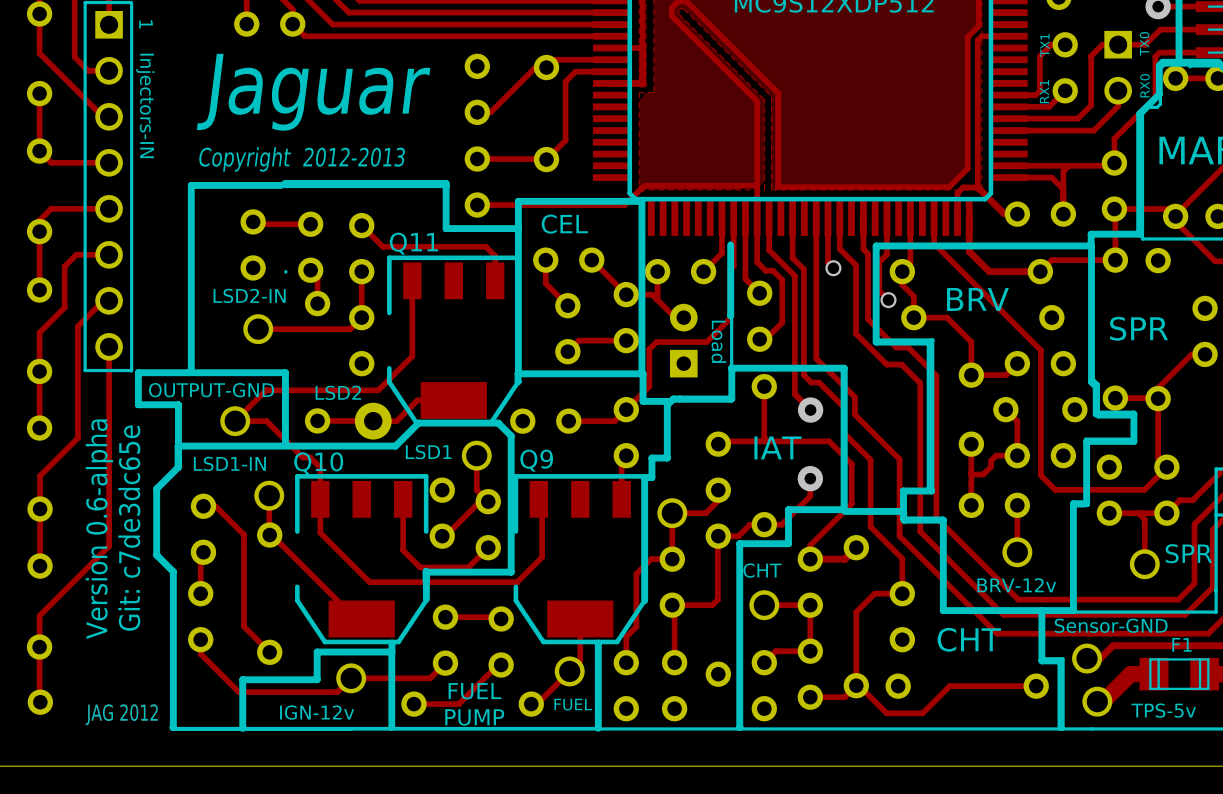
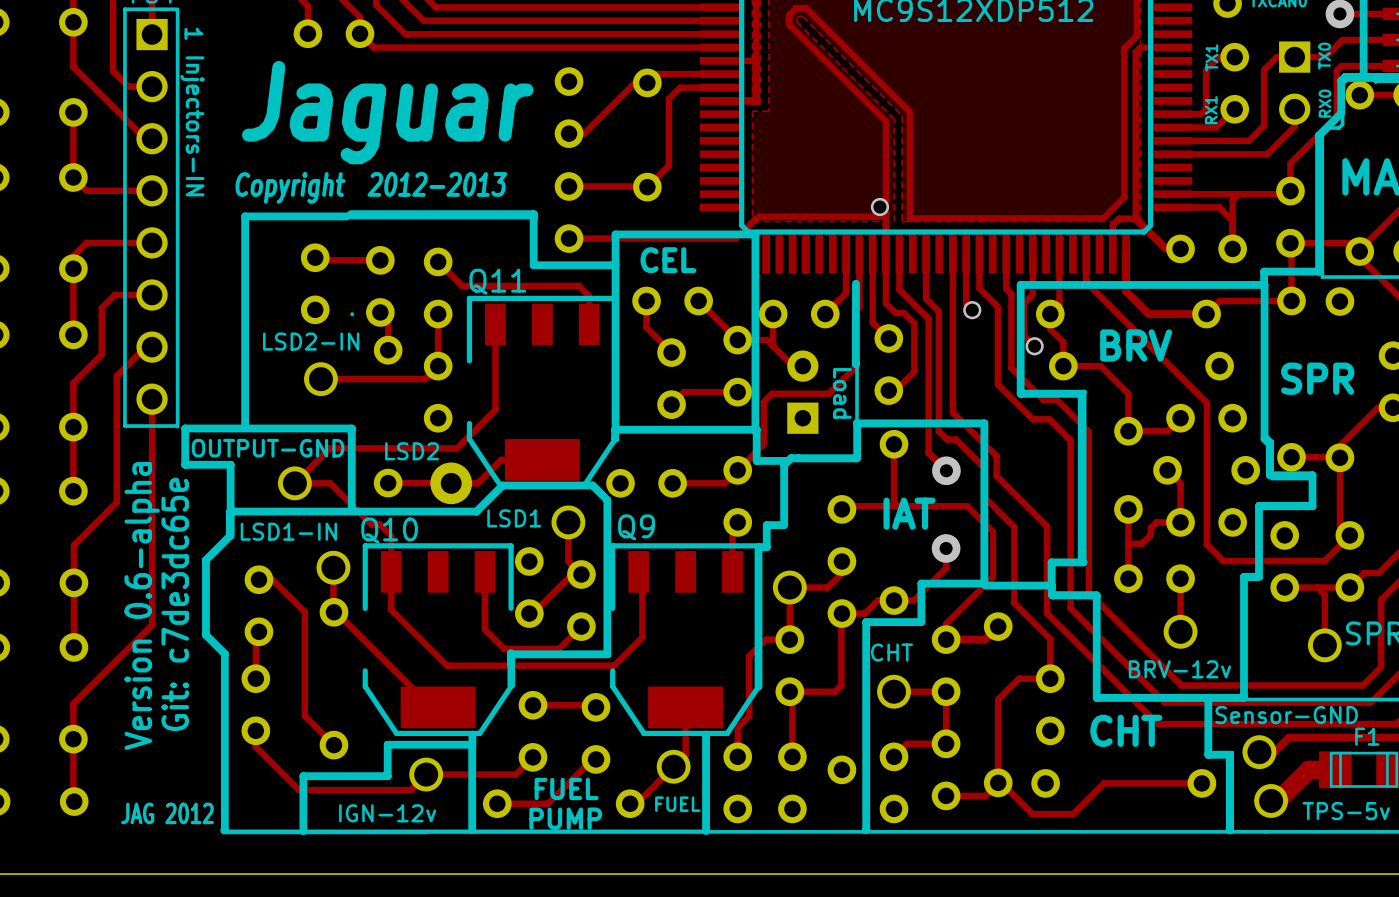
via: none -> (879, 207)

